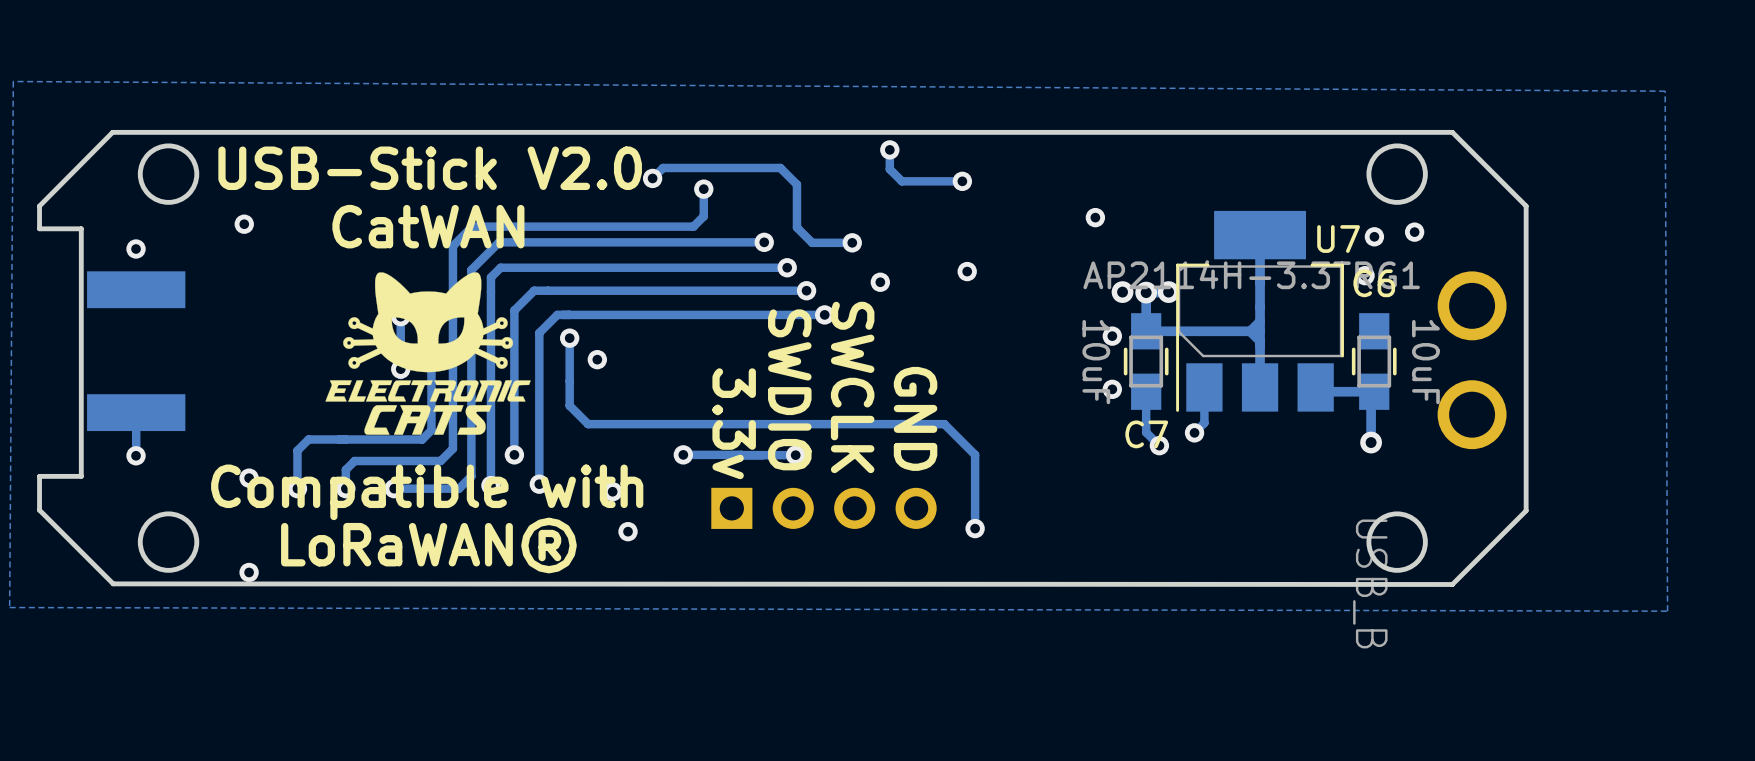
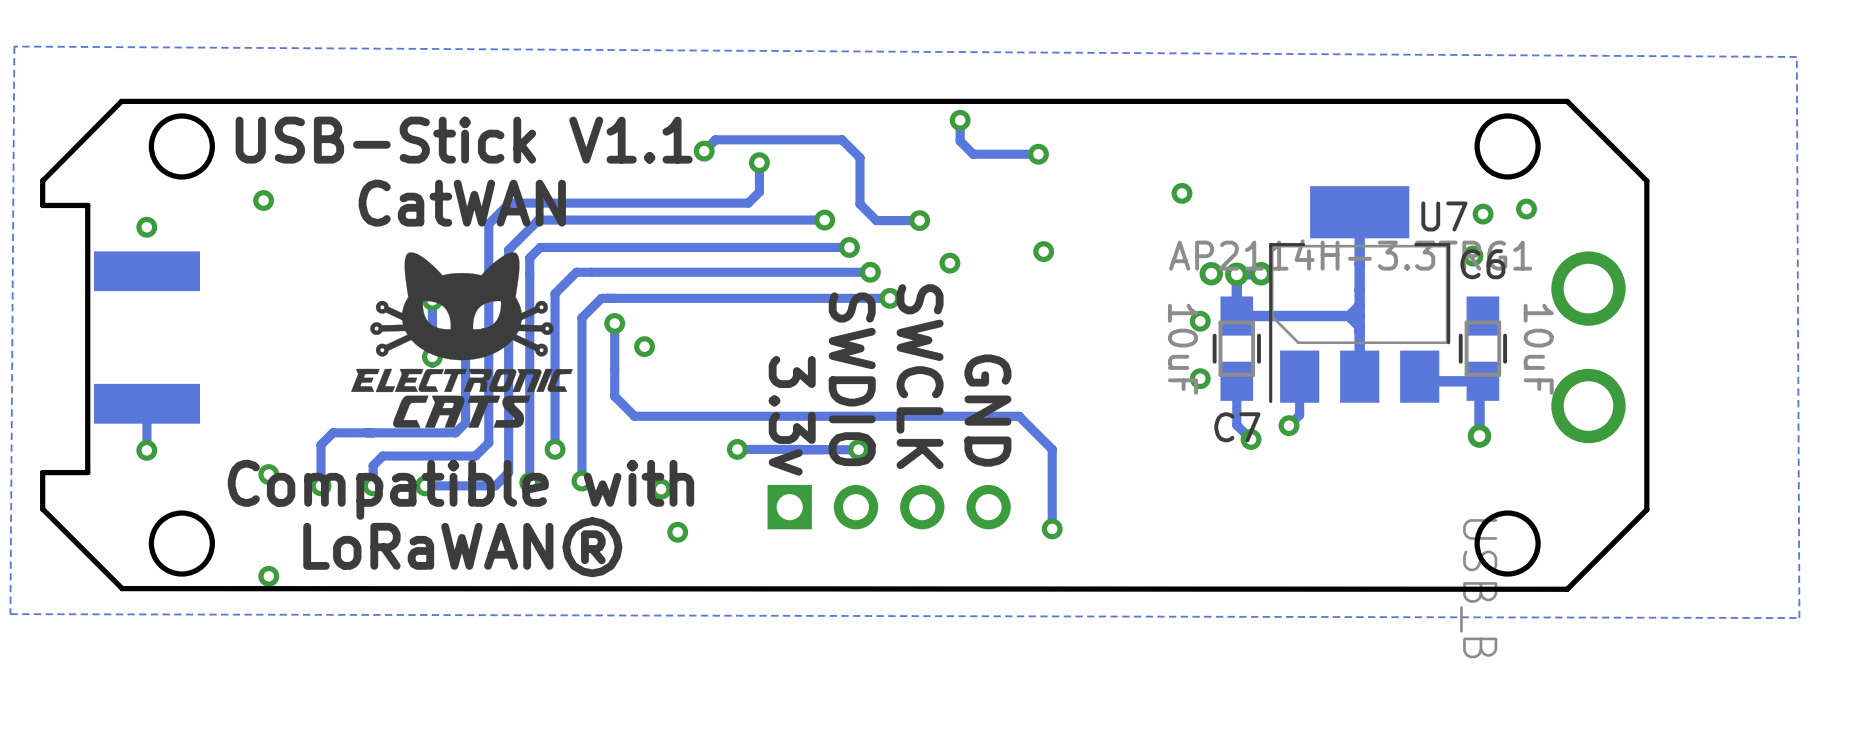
text: USB-Stick V2.0 (430, 168) -> USB-Stick V1.1 (464, 140)

